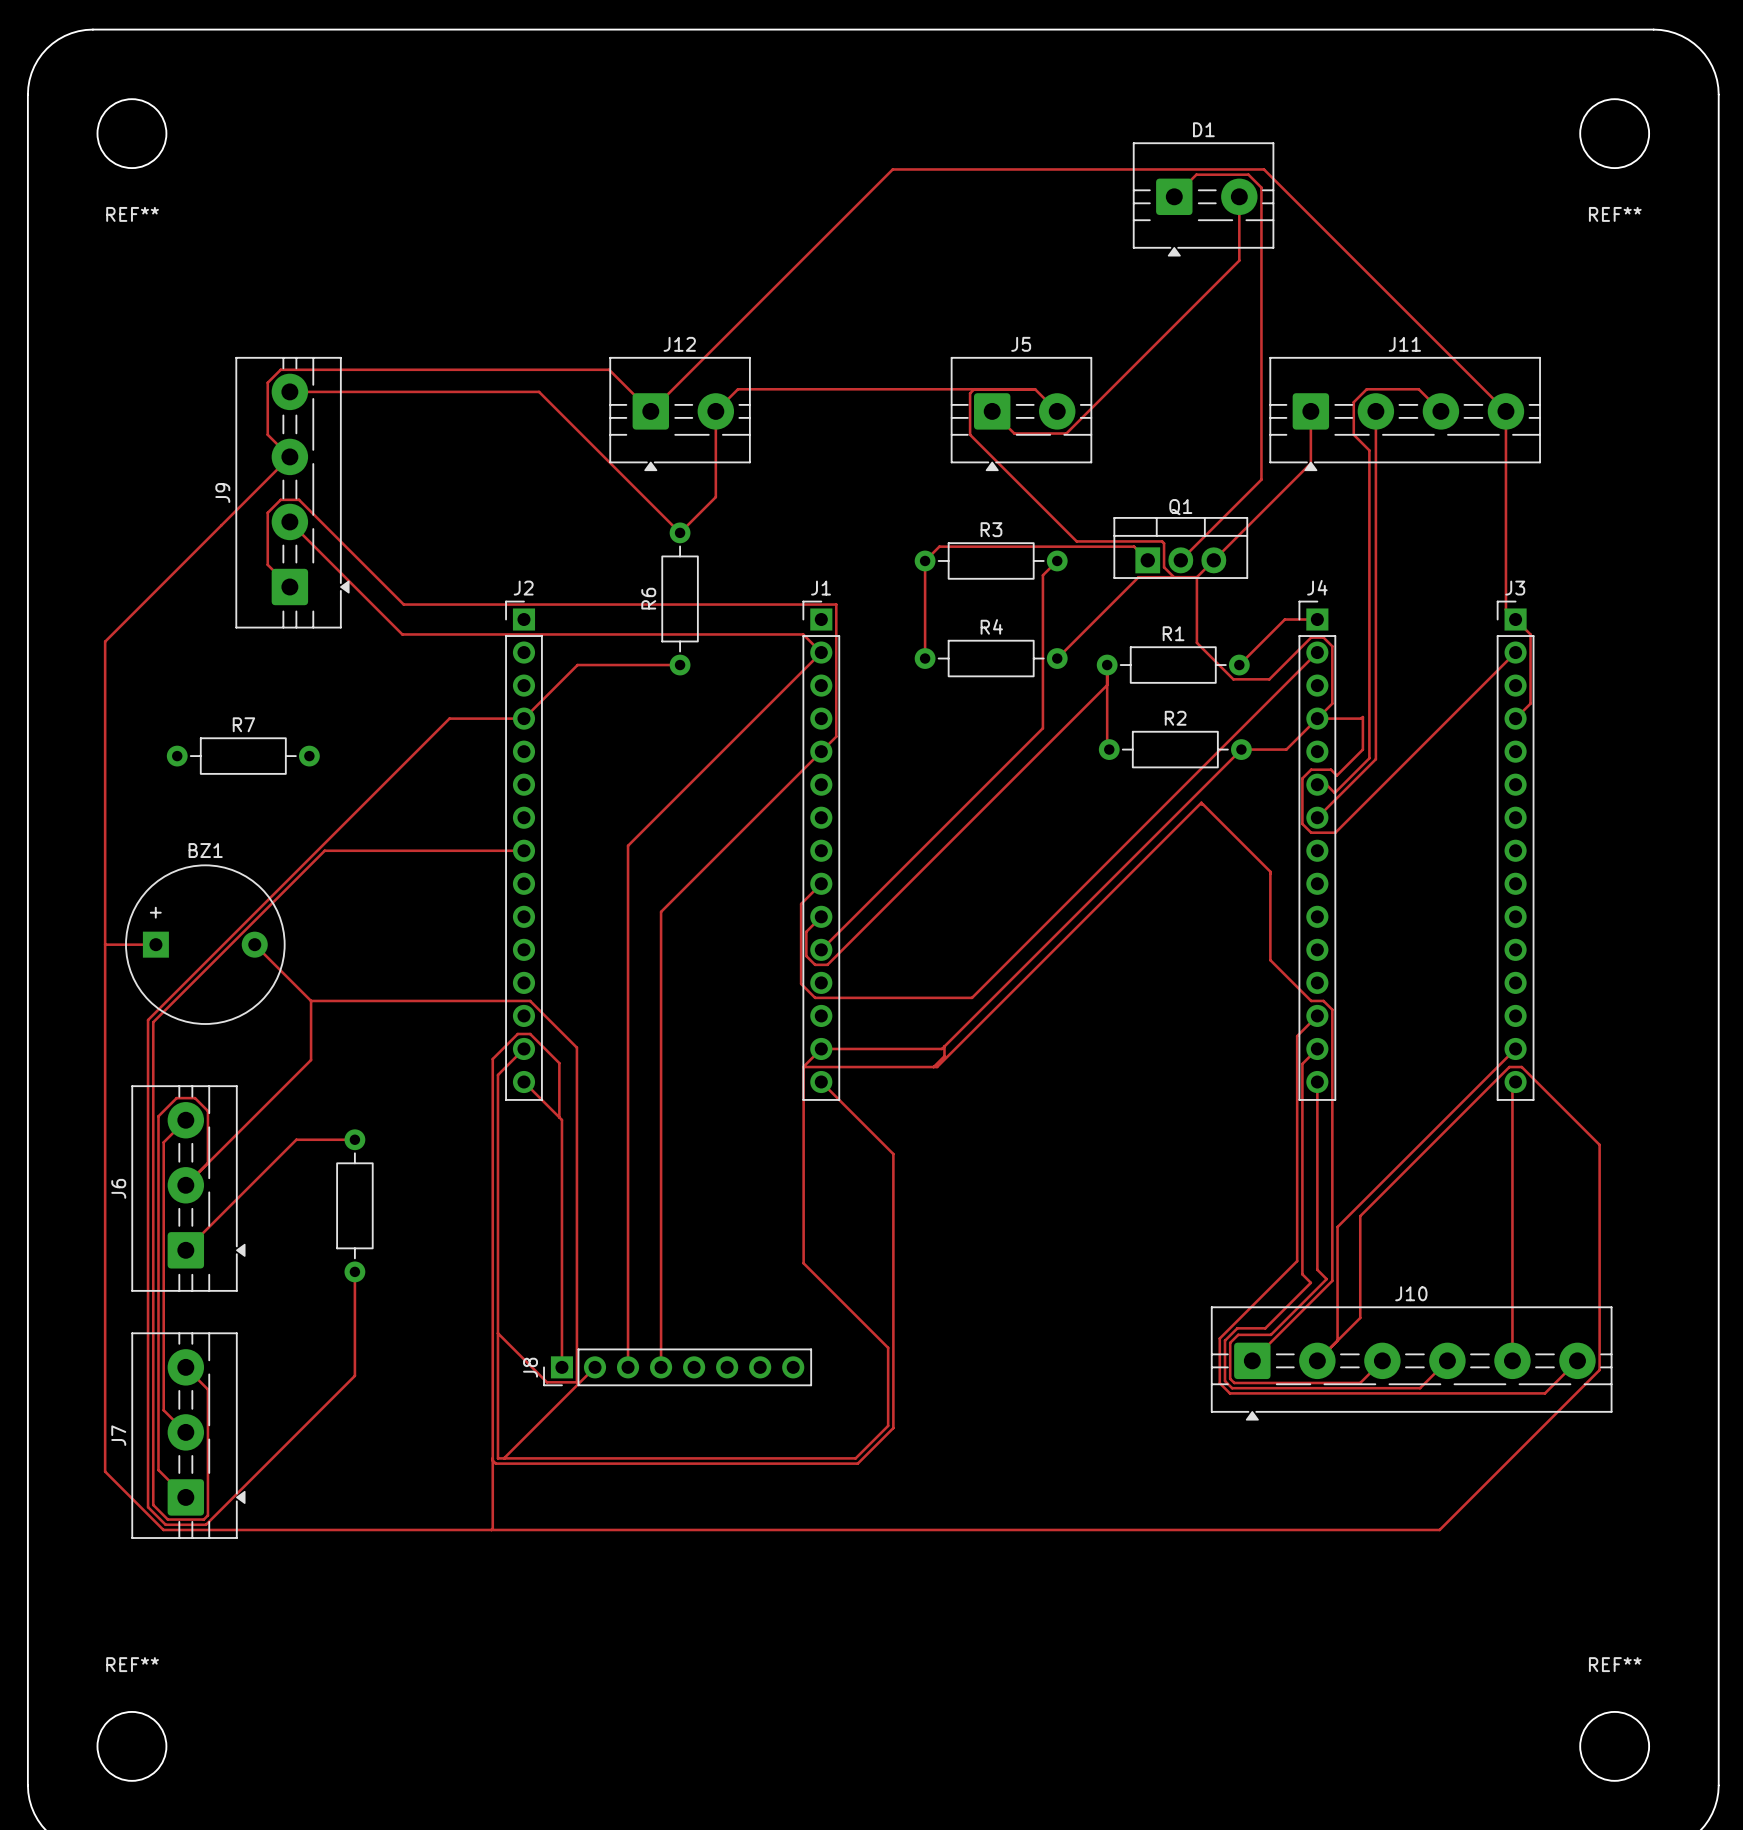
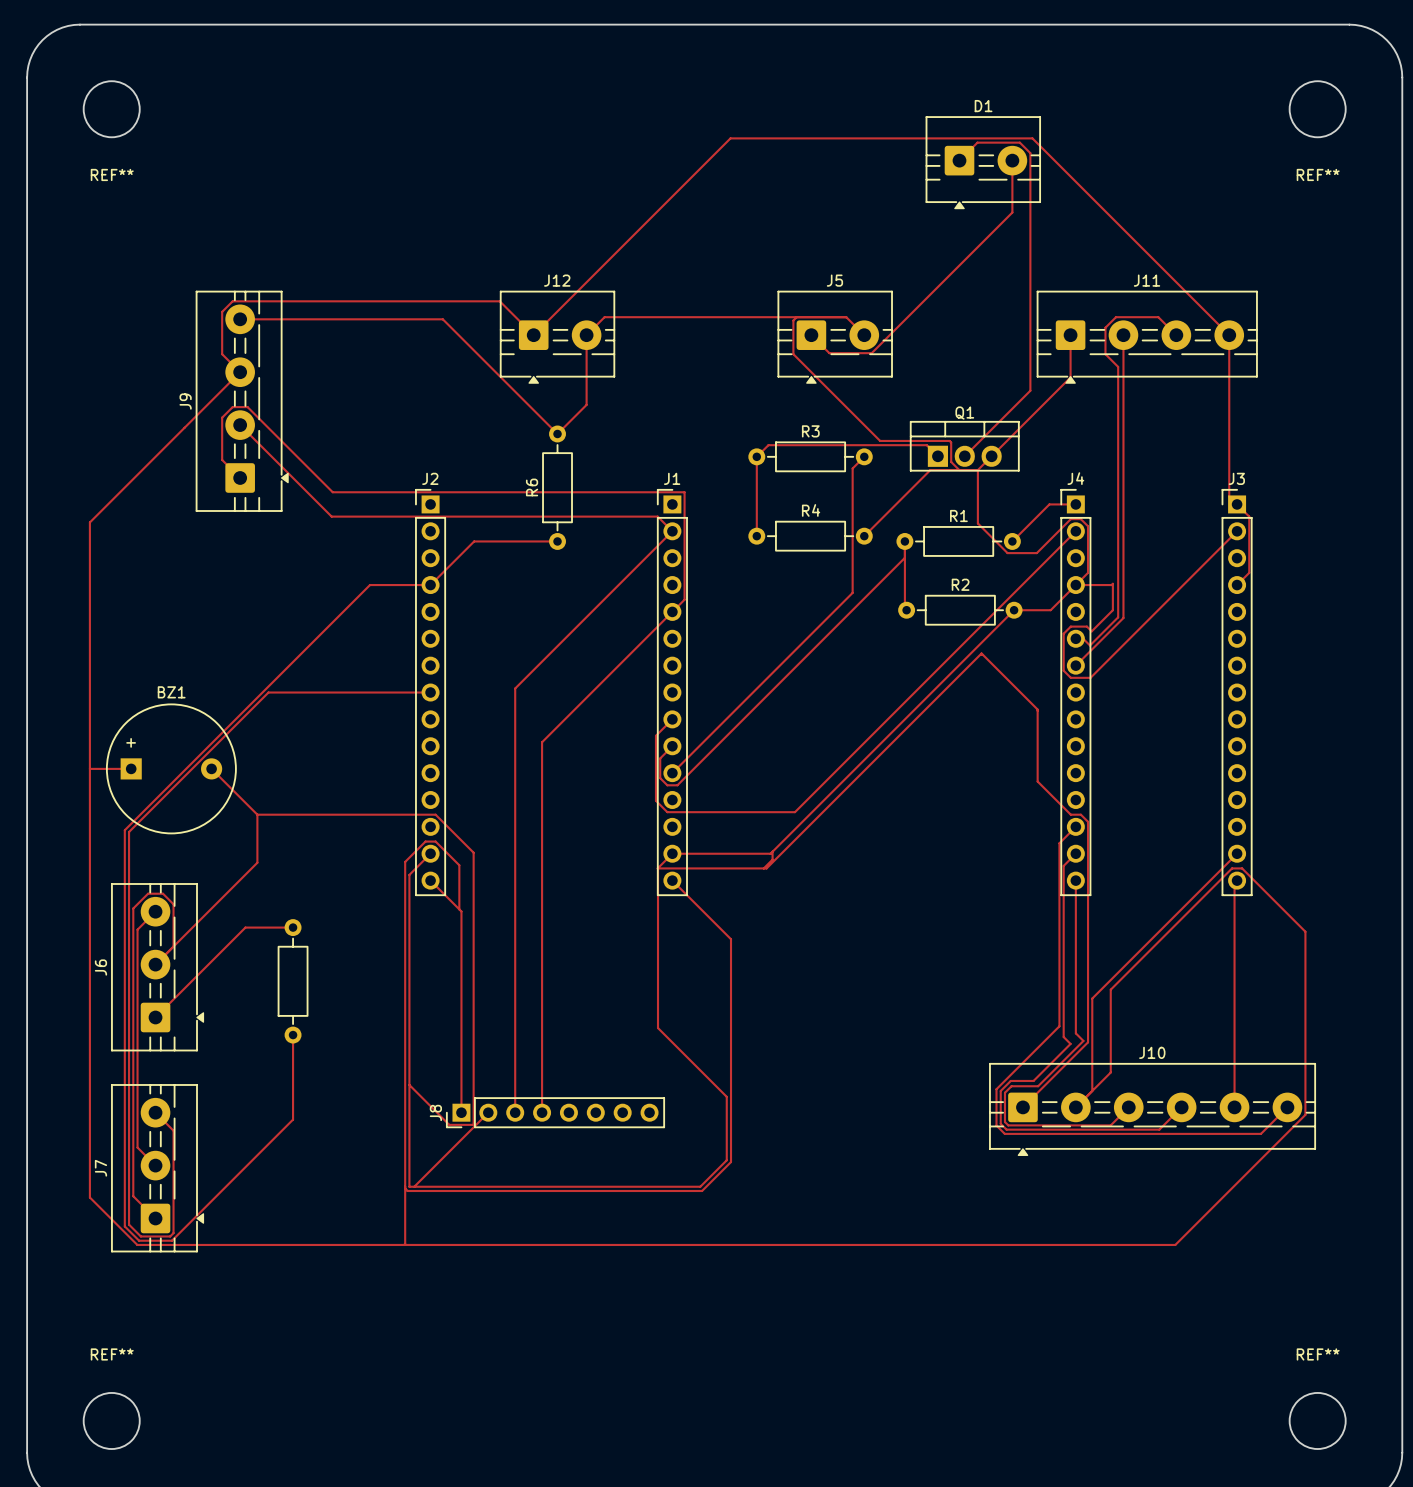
R7: (243, 756) -> none

